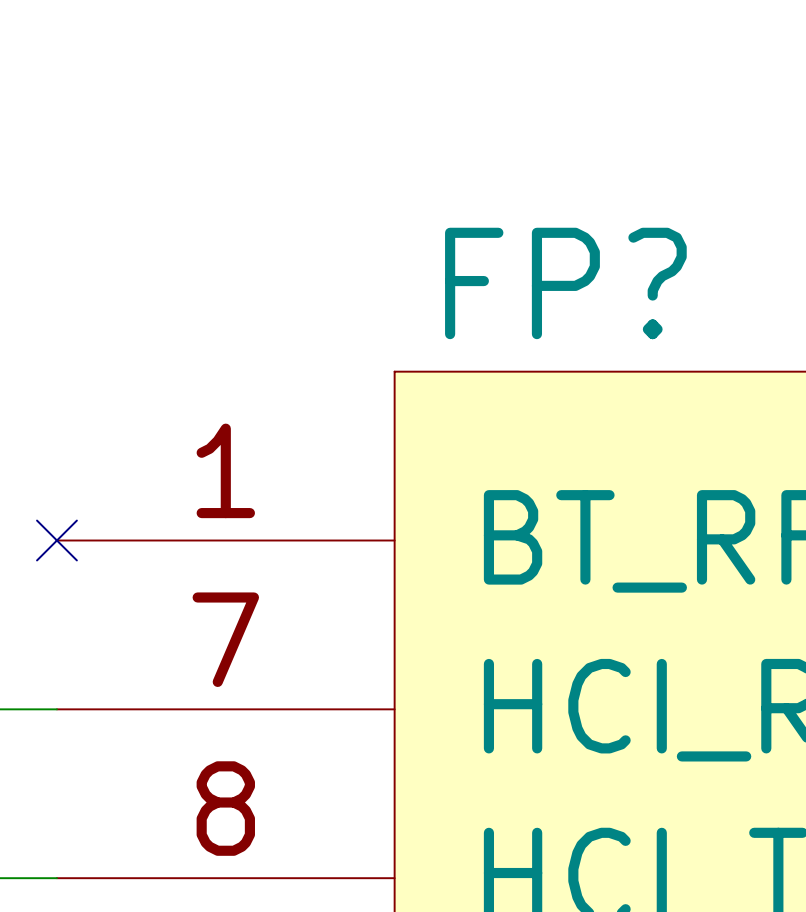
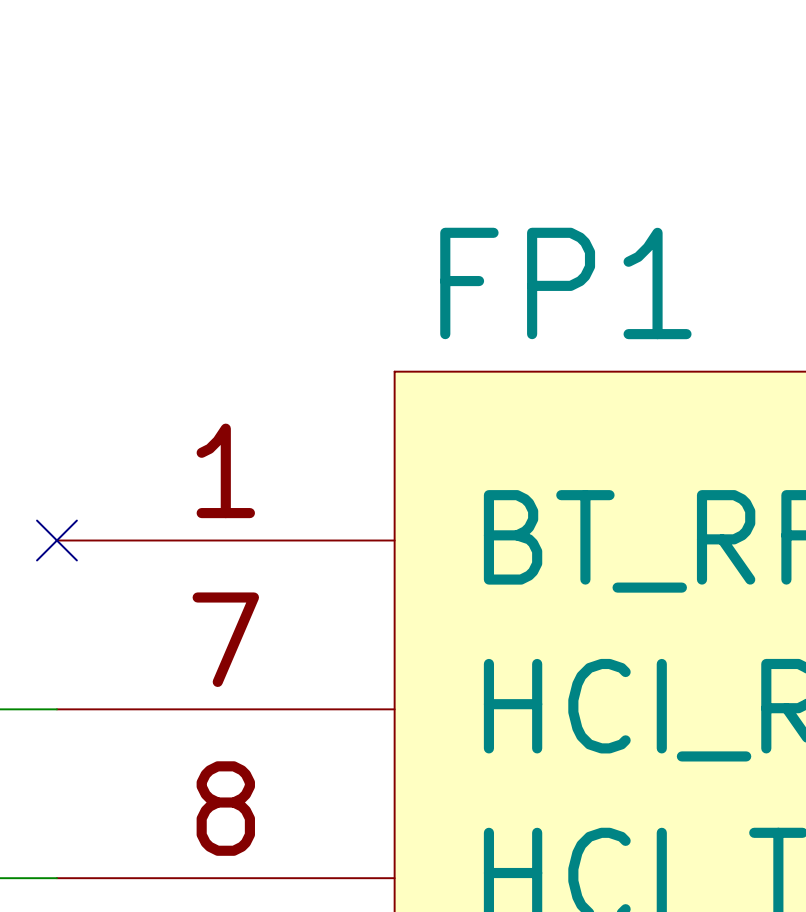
FP? name: FP? (565, 283) -> FP1 (565, 283)

